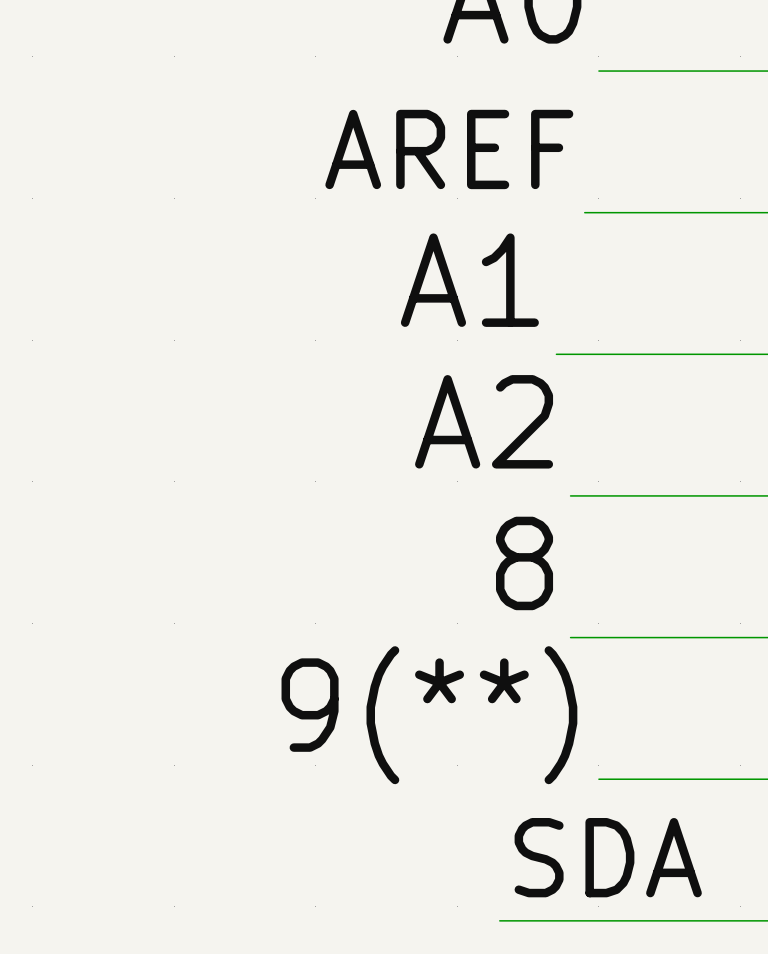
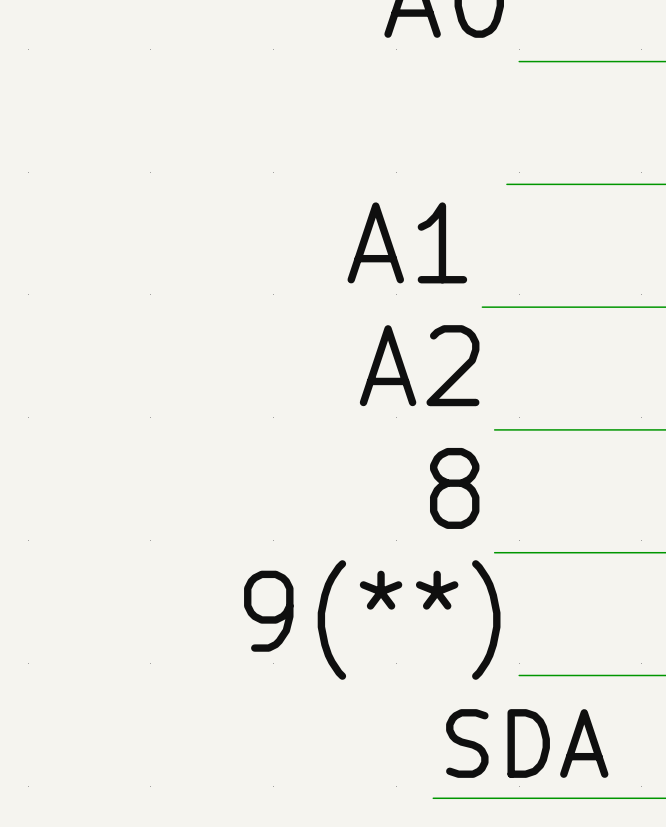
label: AREF (449, 149) -> none

